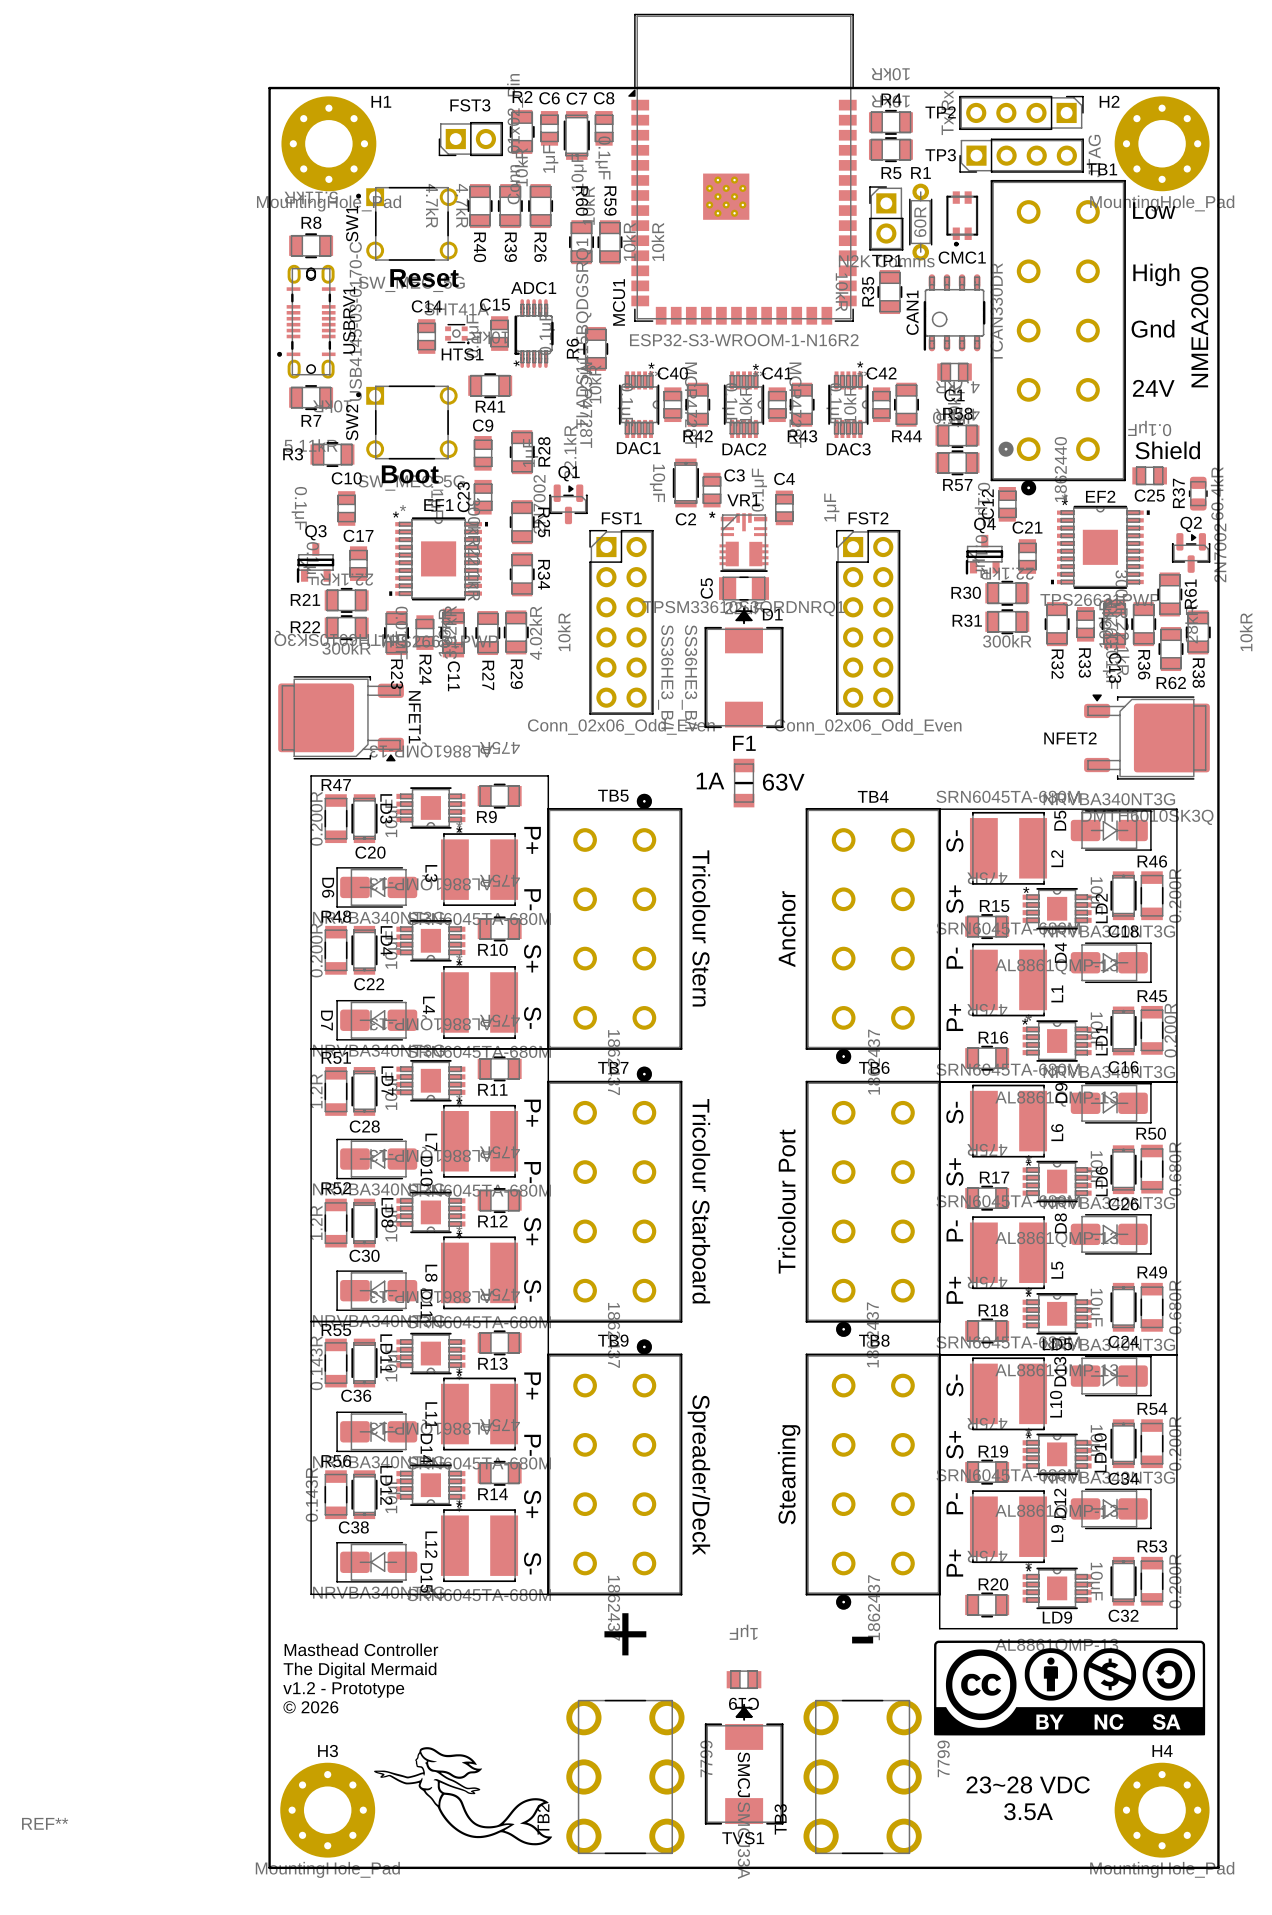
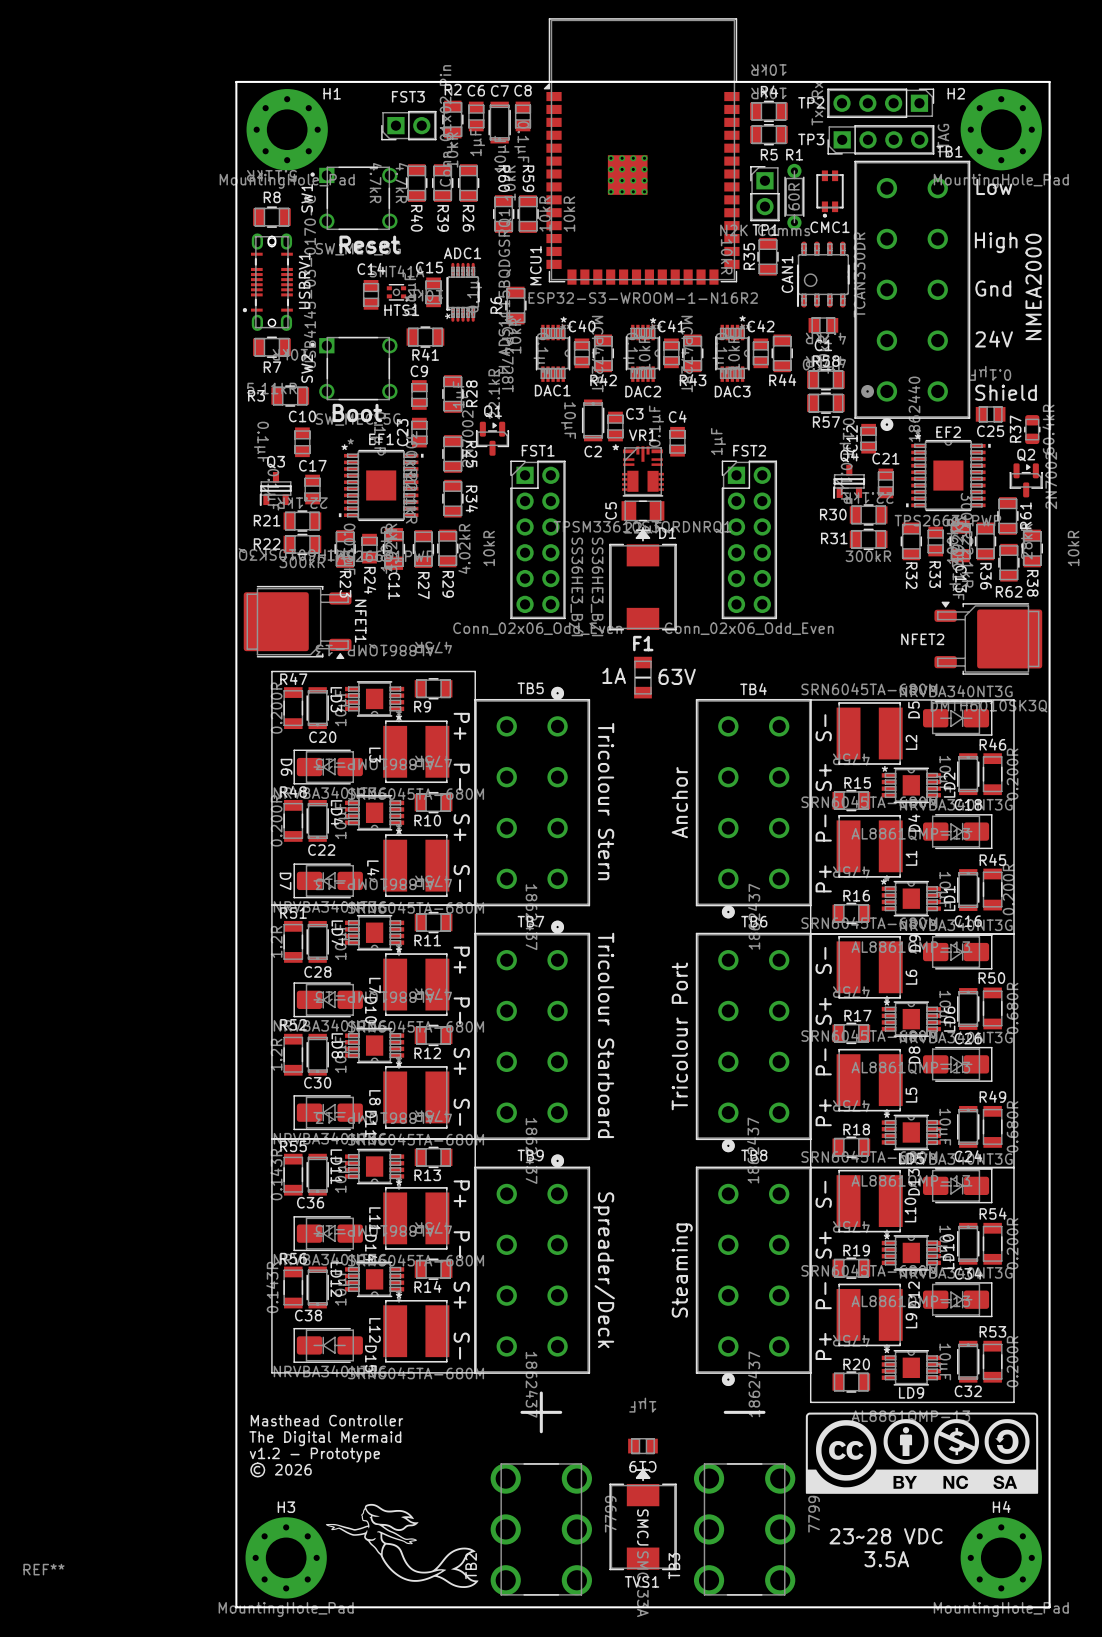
MCU1 footprint: [628, 13, 857, 325] -> [543, 18, 740, 285]

